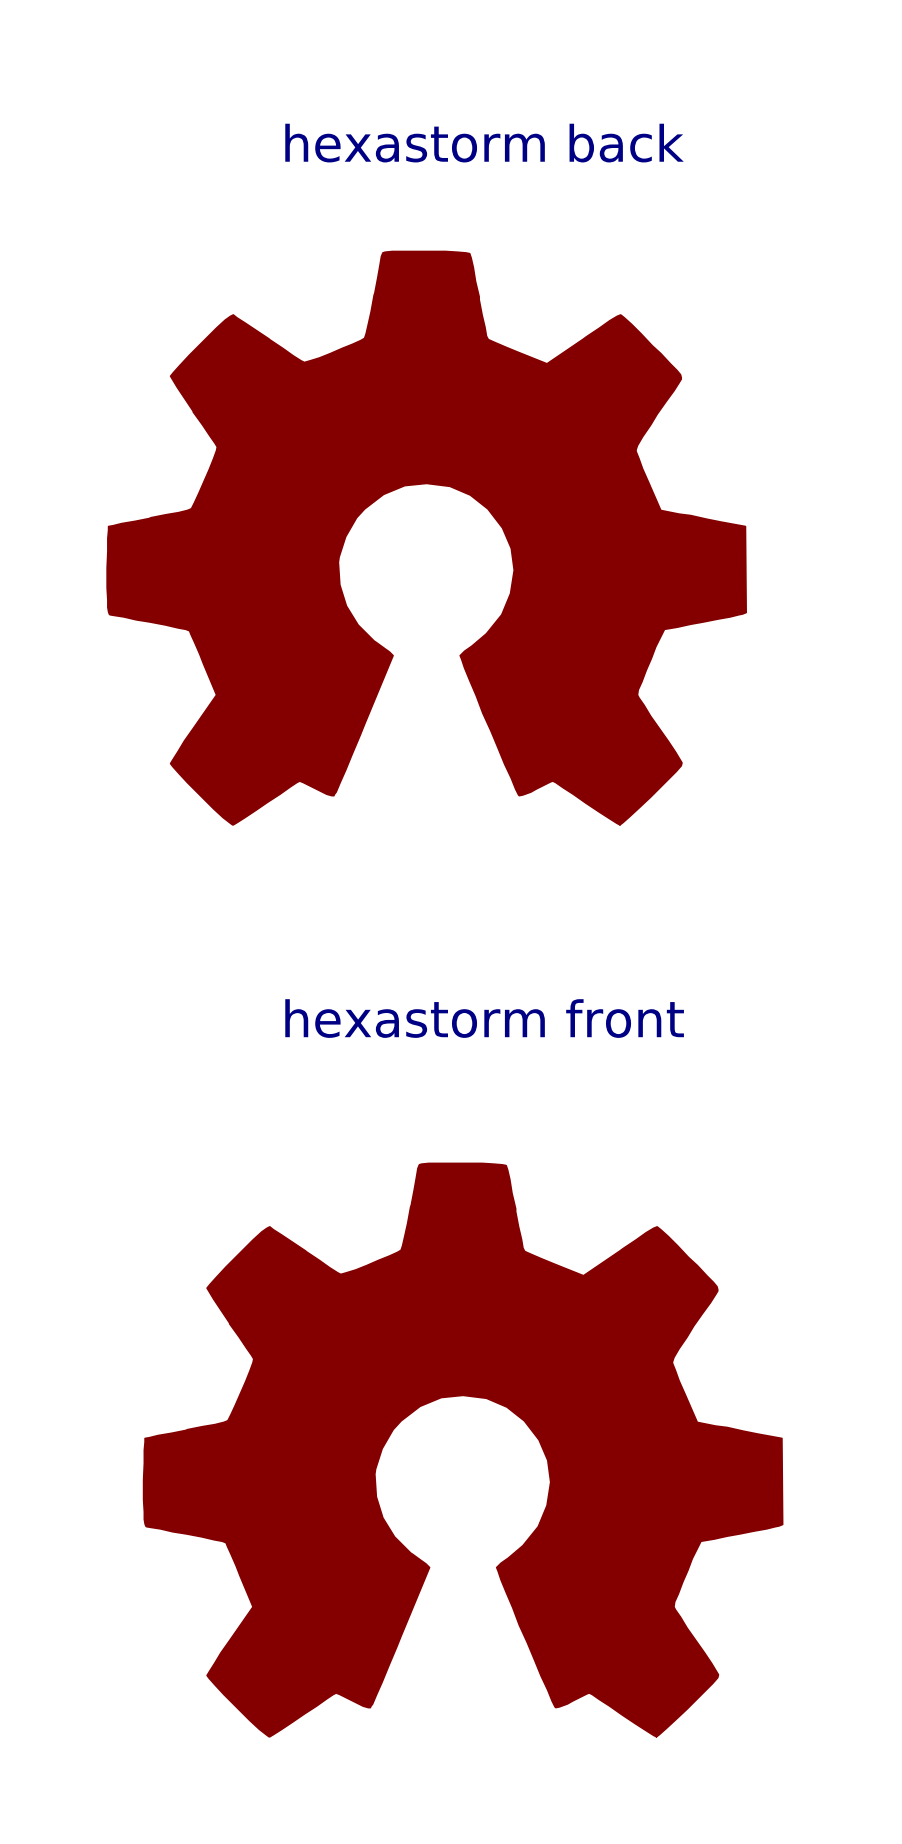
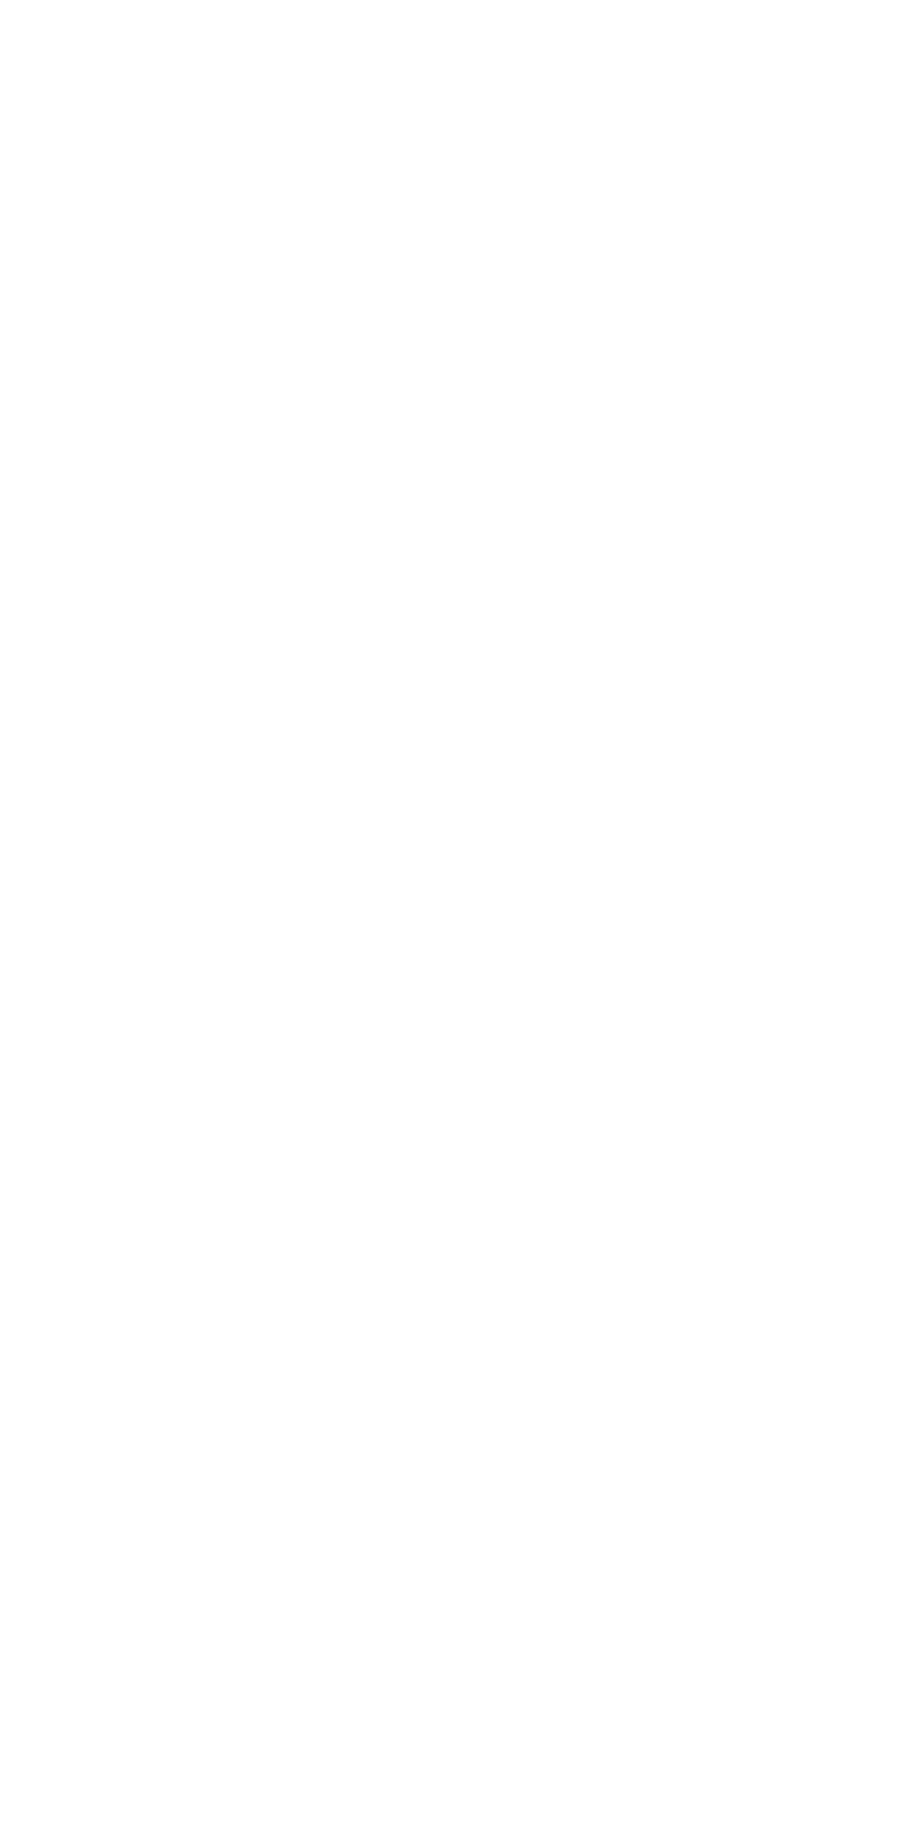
text: hexastorm back (484, 143) -> none
part: (426, 538) -> none
text: hexastorm front (484, 1018) -> none
part: (463, 1450) -> none

